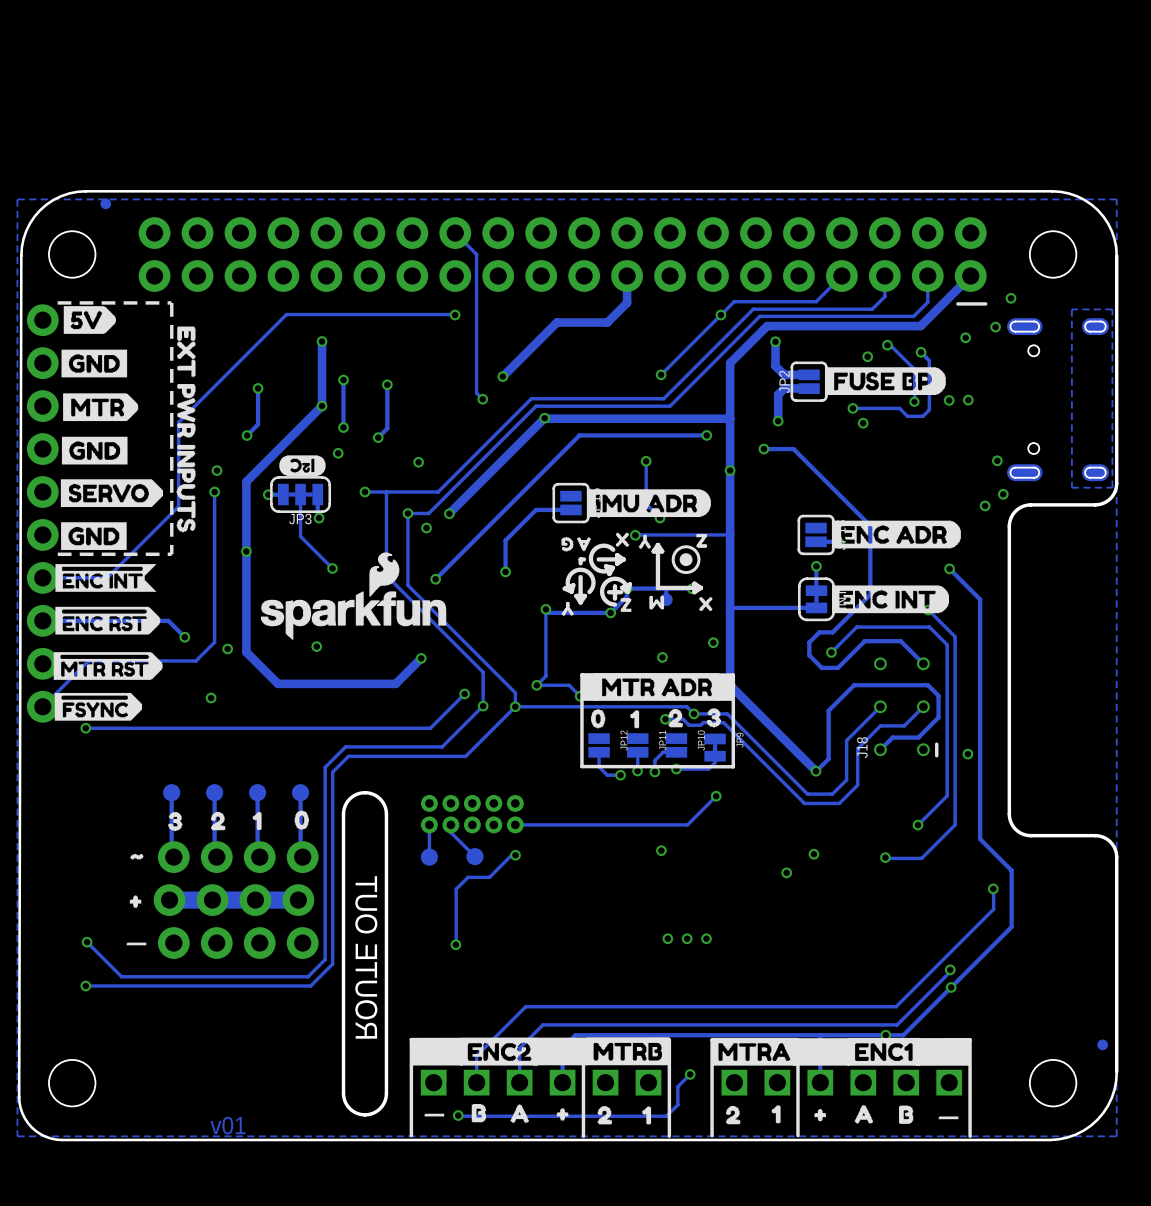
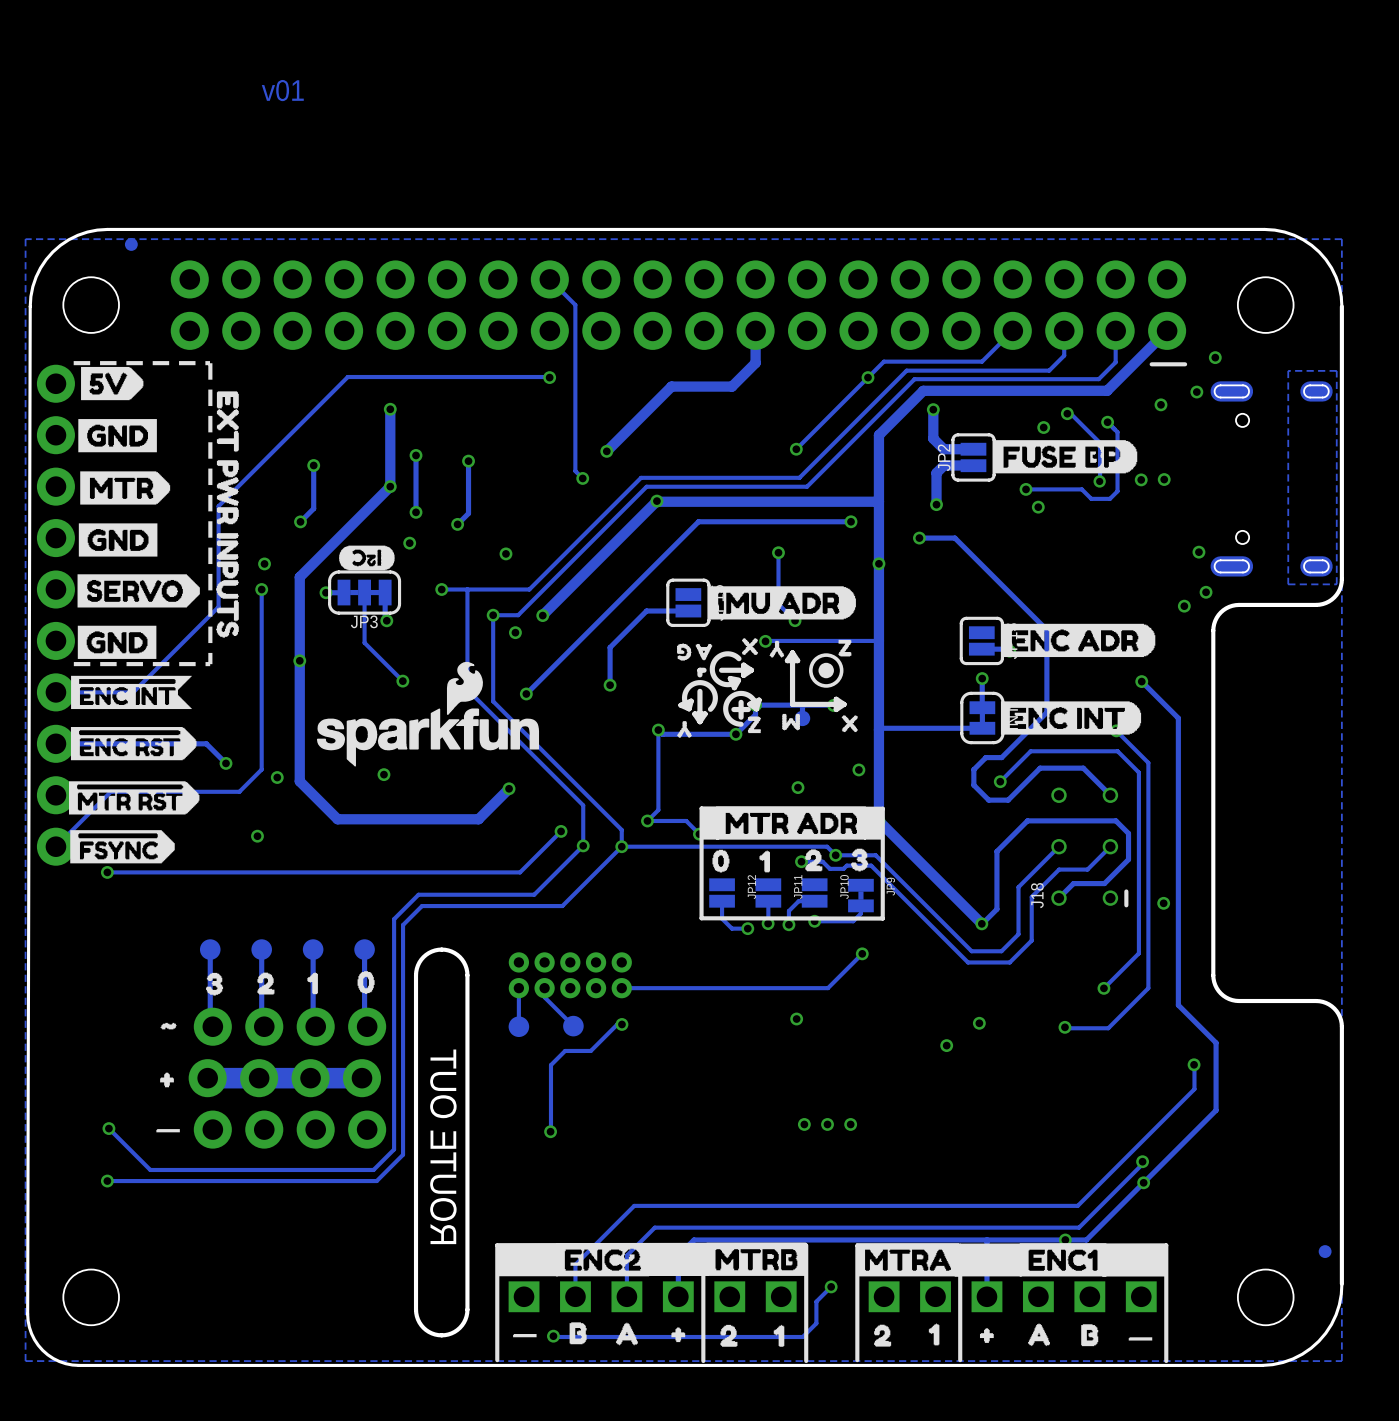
text: none -> v01 (282, 90)
text: v01 (227, 1125) -> none

